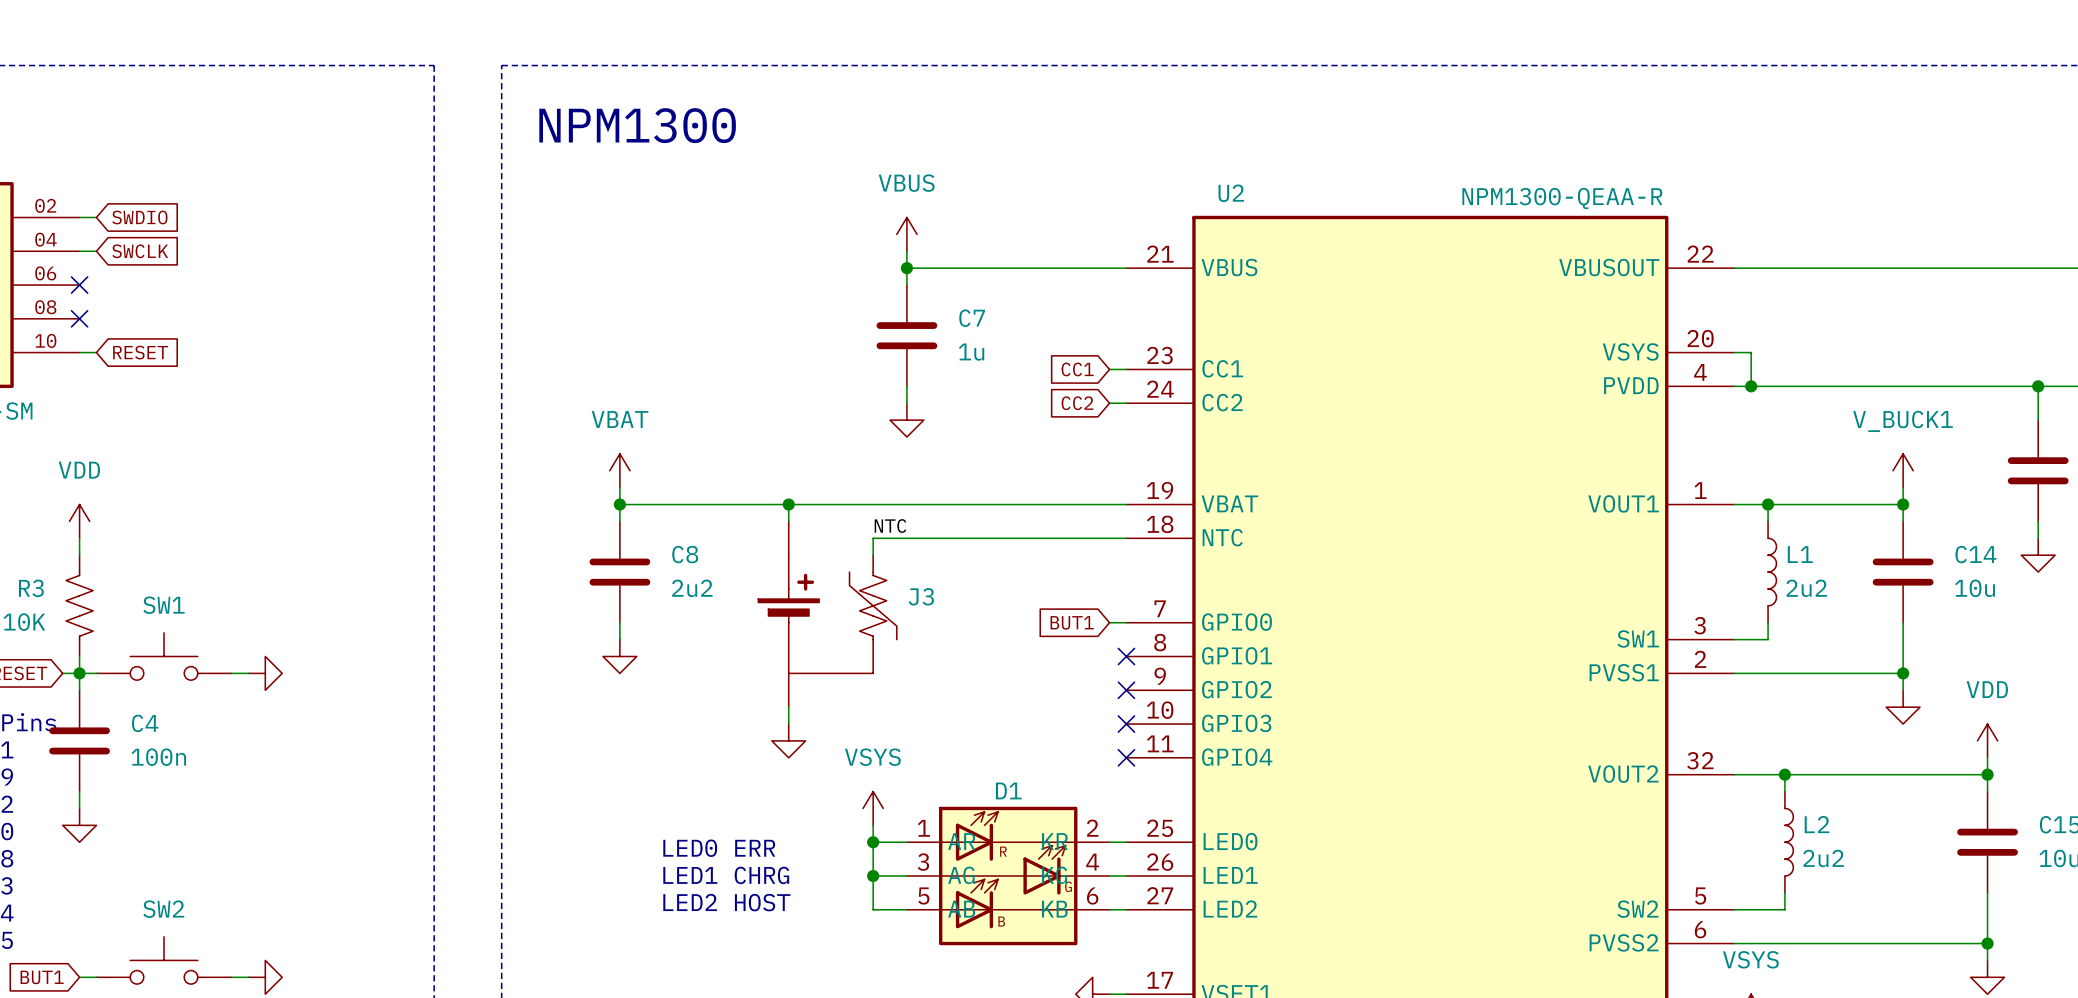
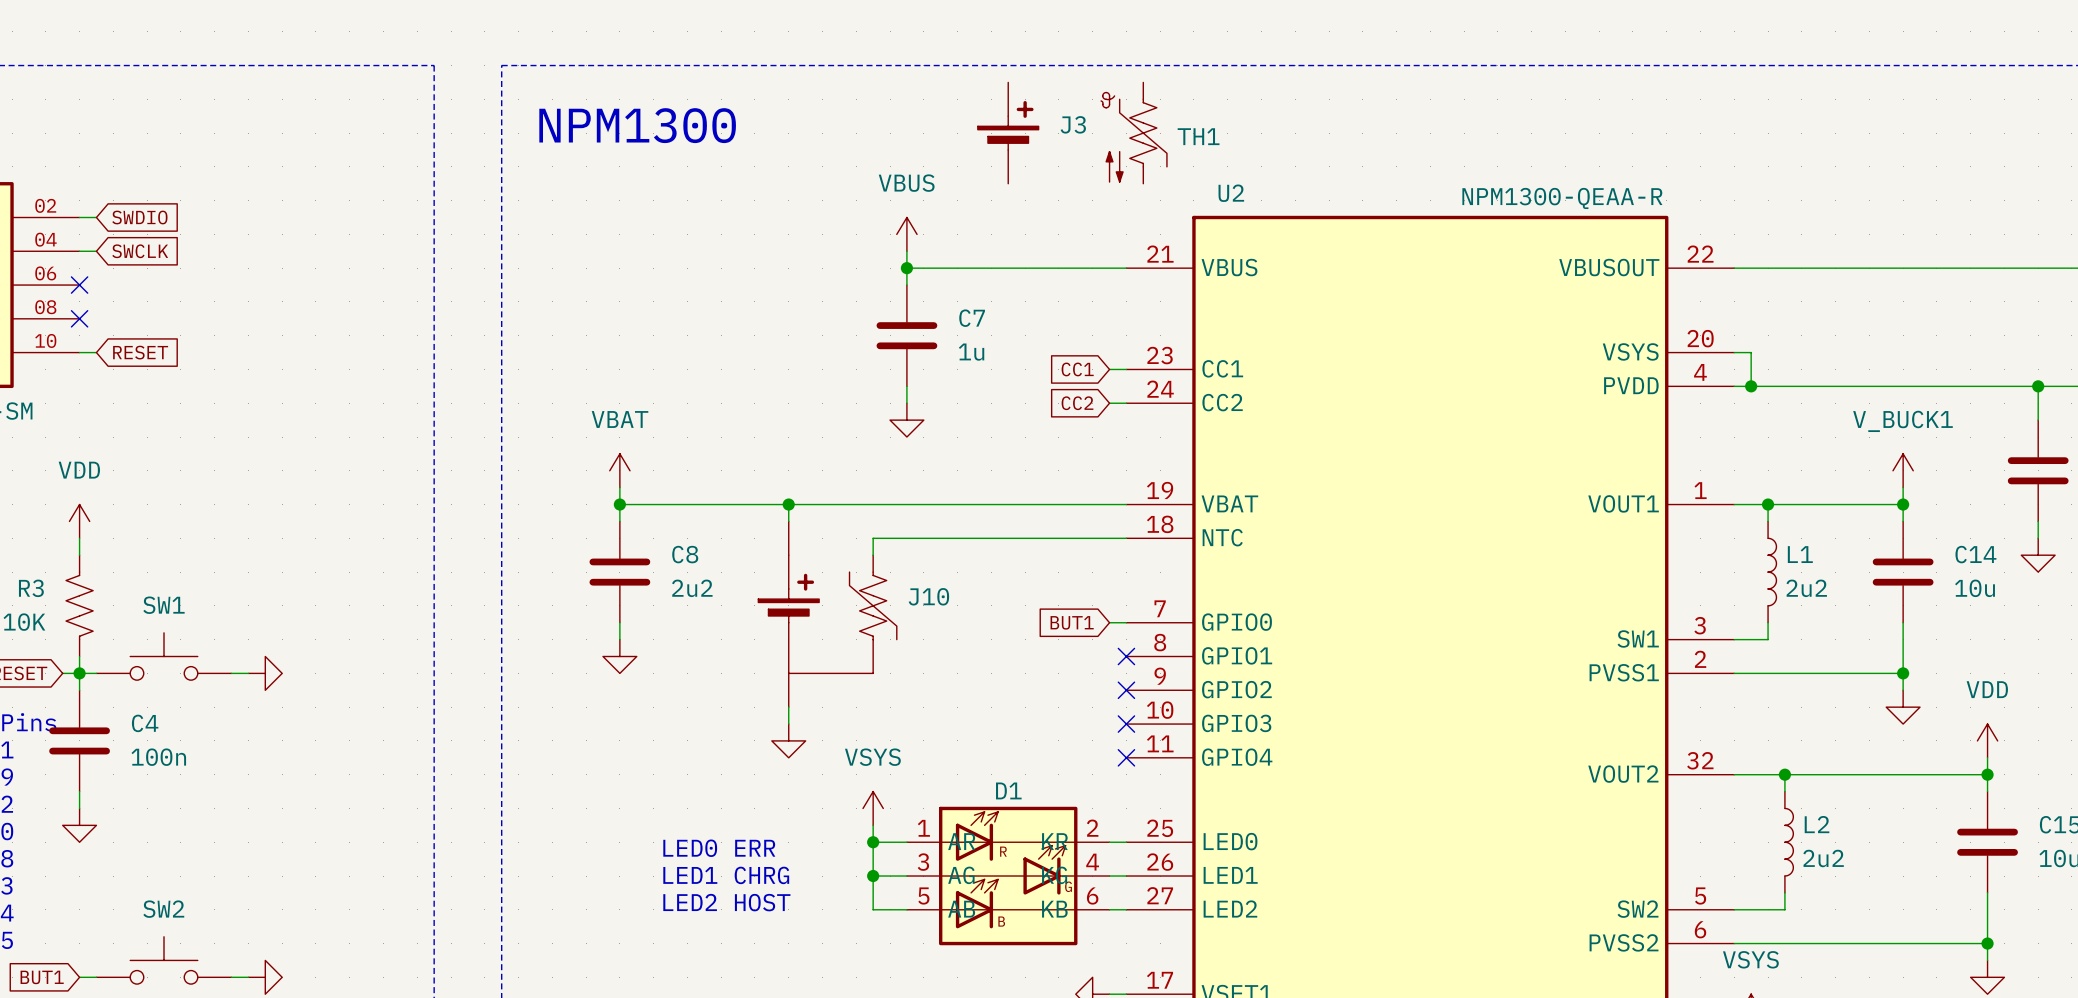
J3: none -> (1008, 133)
TH1: none -> (1134, 133)
label: NTC (890, 526) -> none
J3 name: J3 (921, 596) -> J10 (928, 596)

